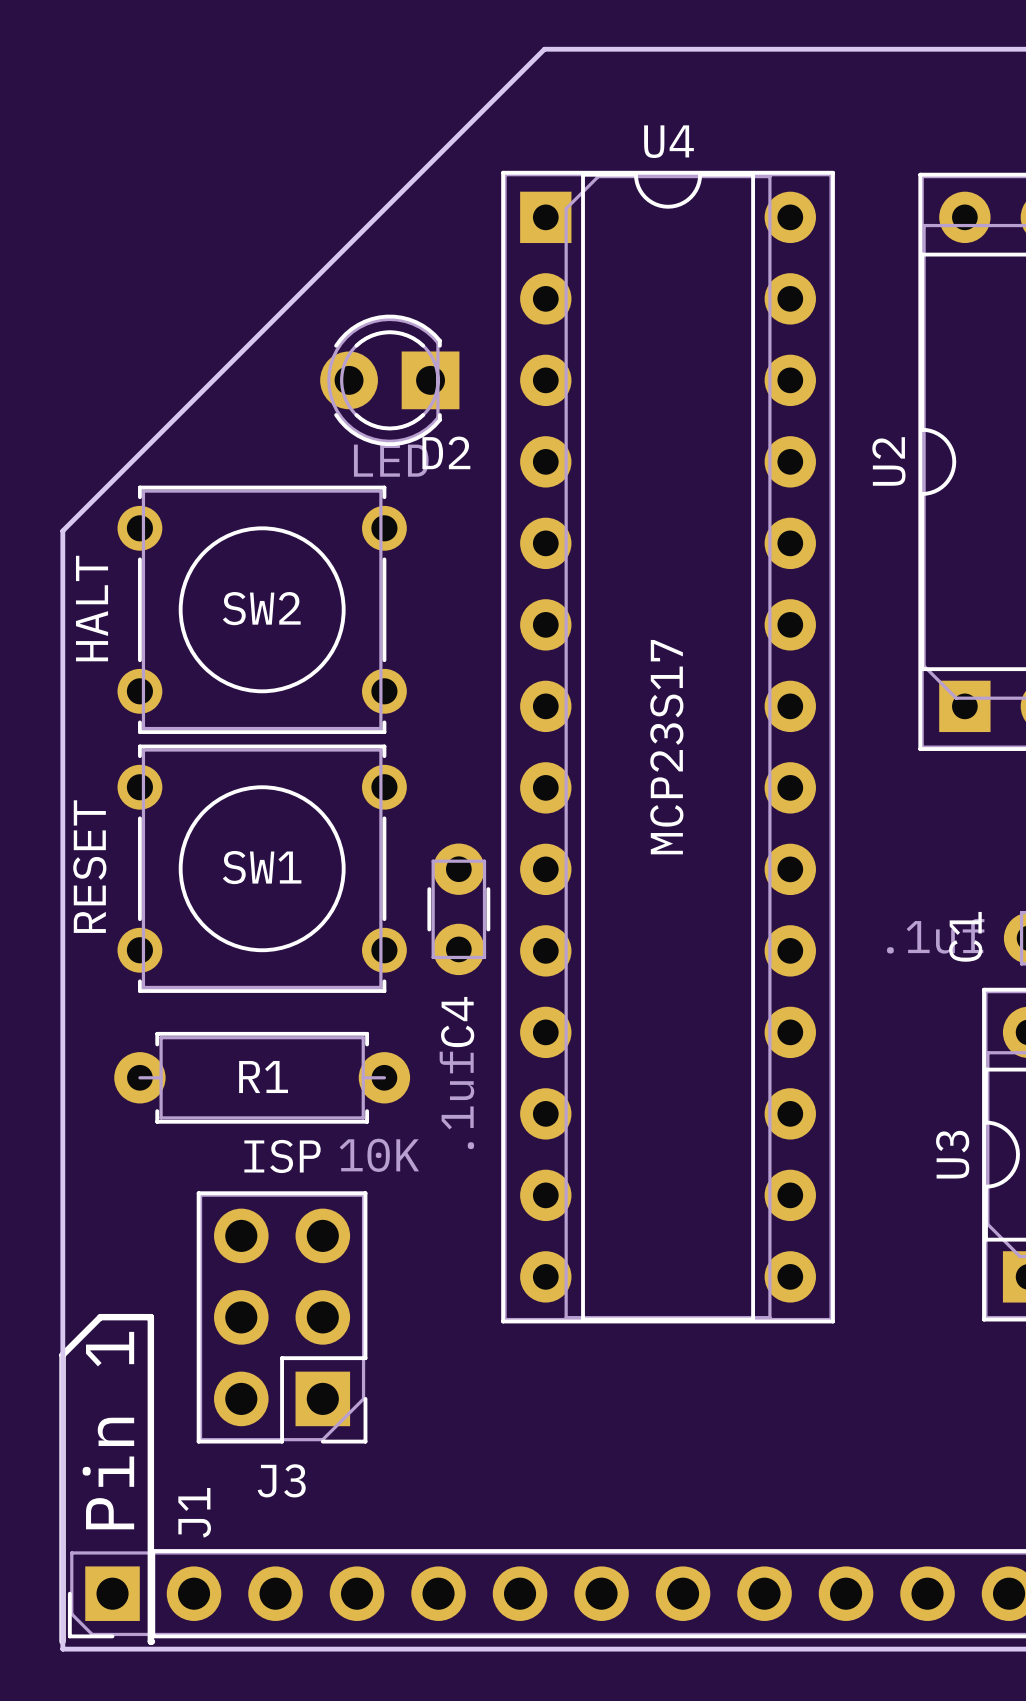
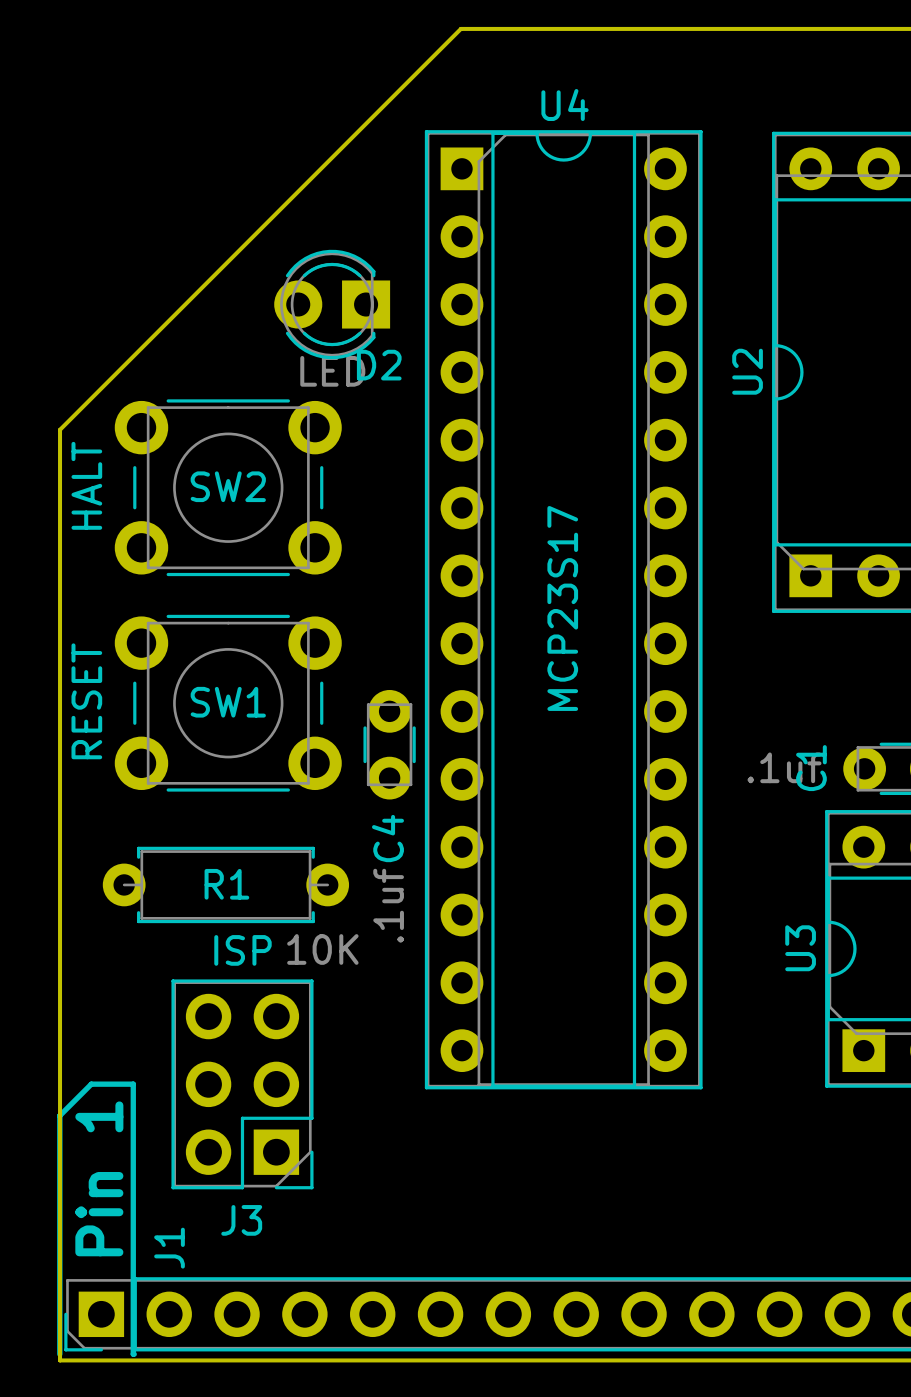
SW2 footprint: [117, 485, 407, 734] -> [114, 399, 342, 577]
SW1 footprint: [117, 744, 407, 993] -> [114, 614, 342, 792]

